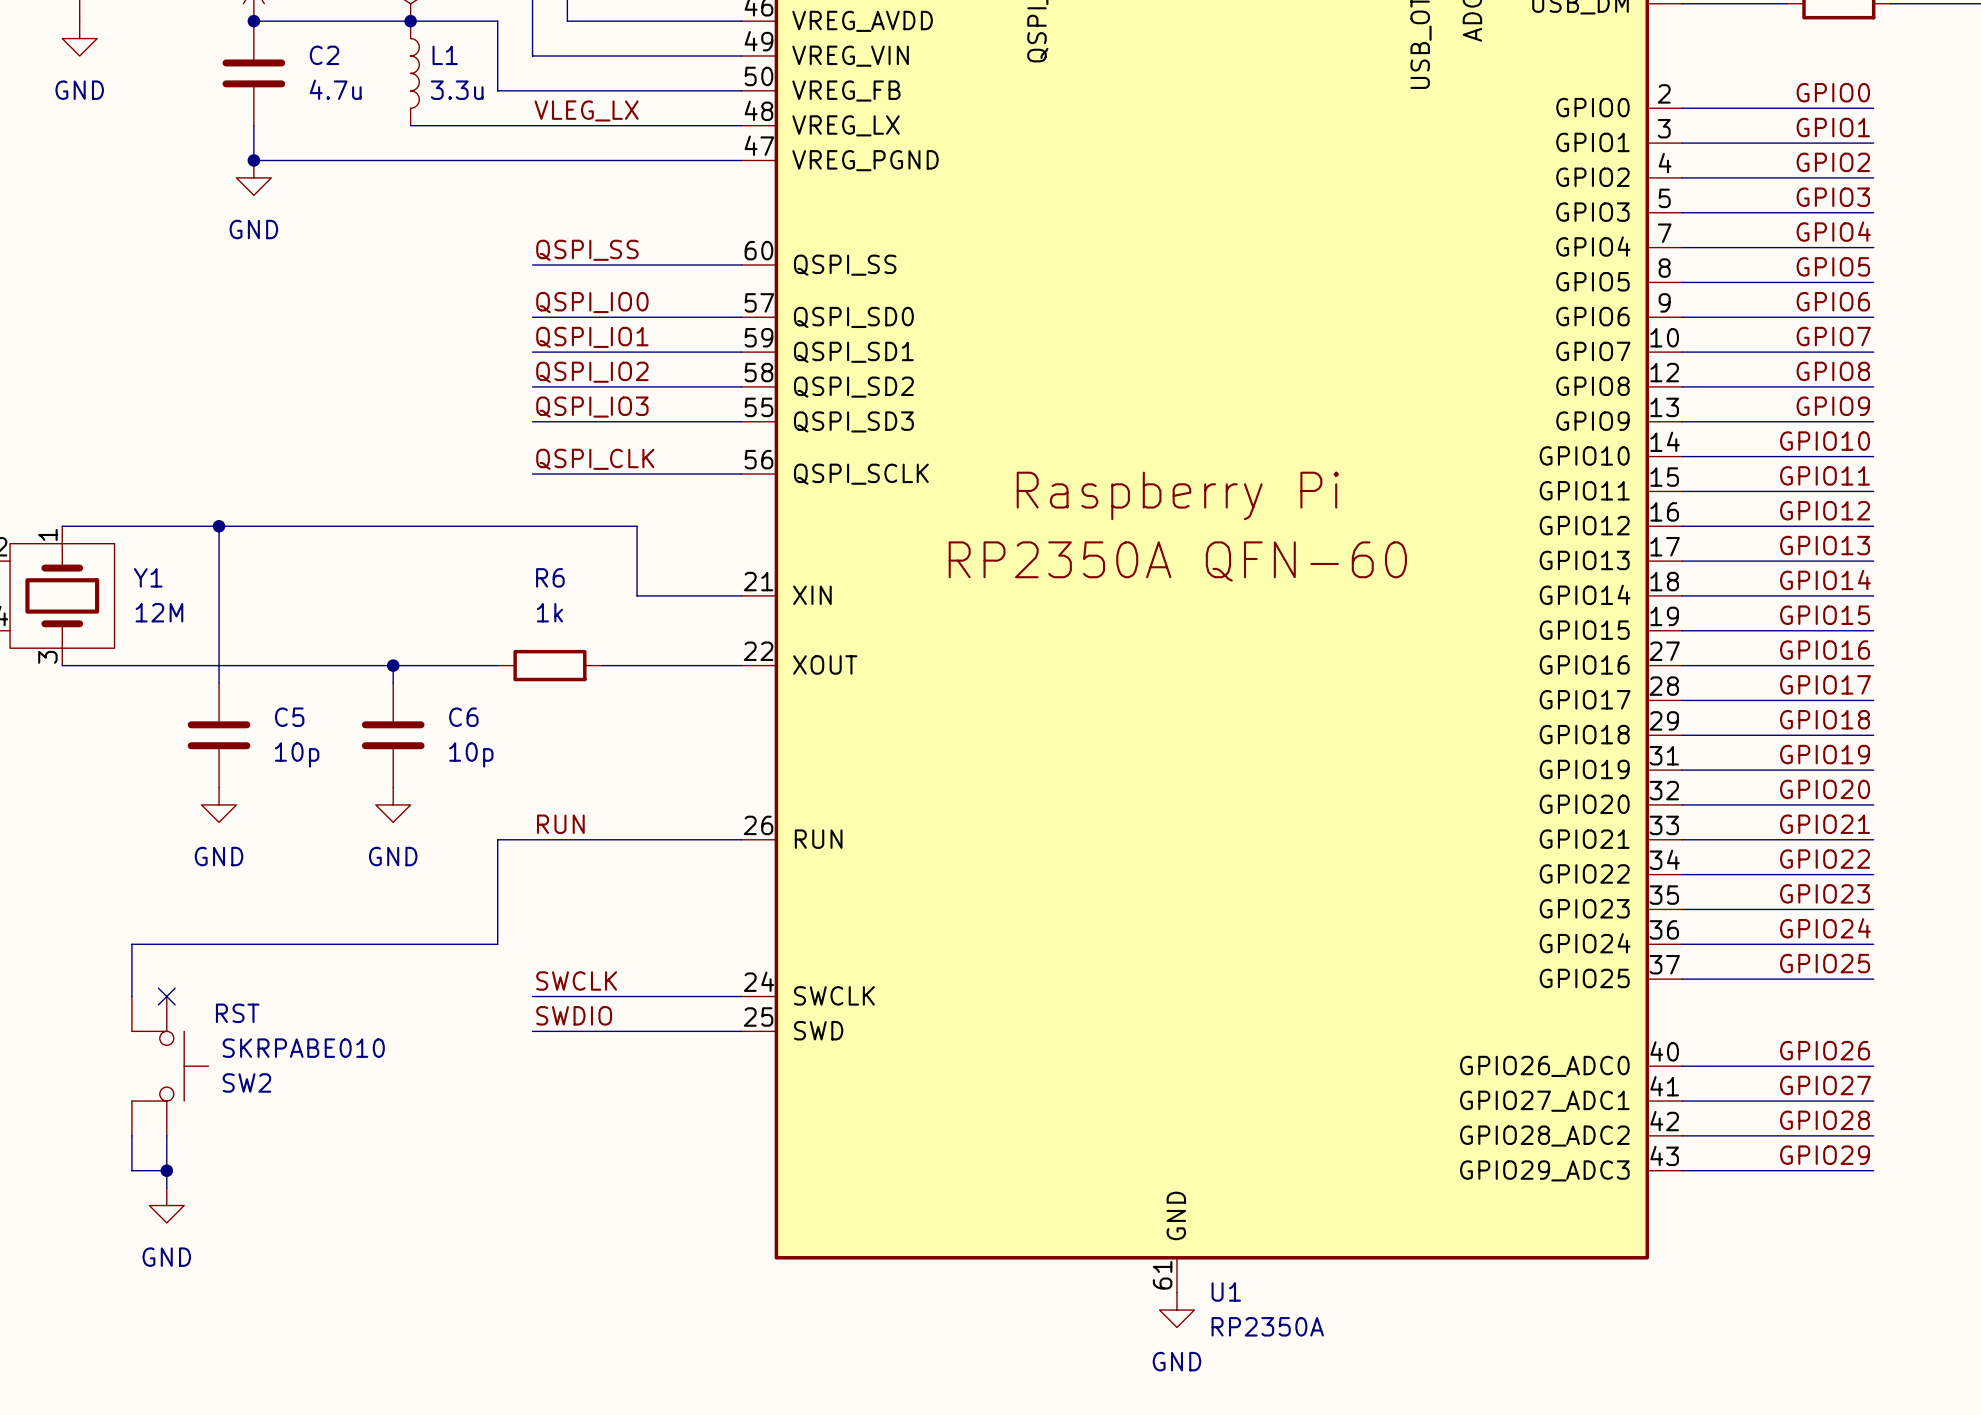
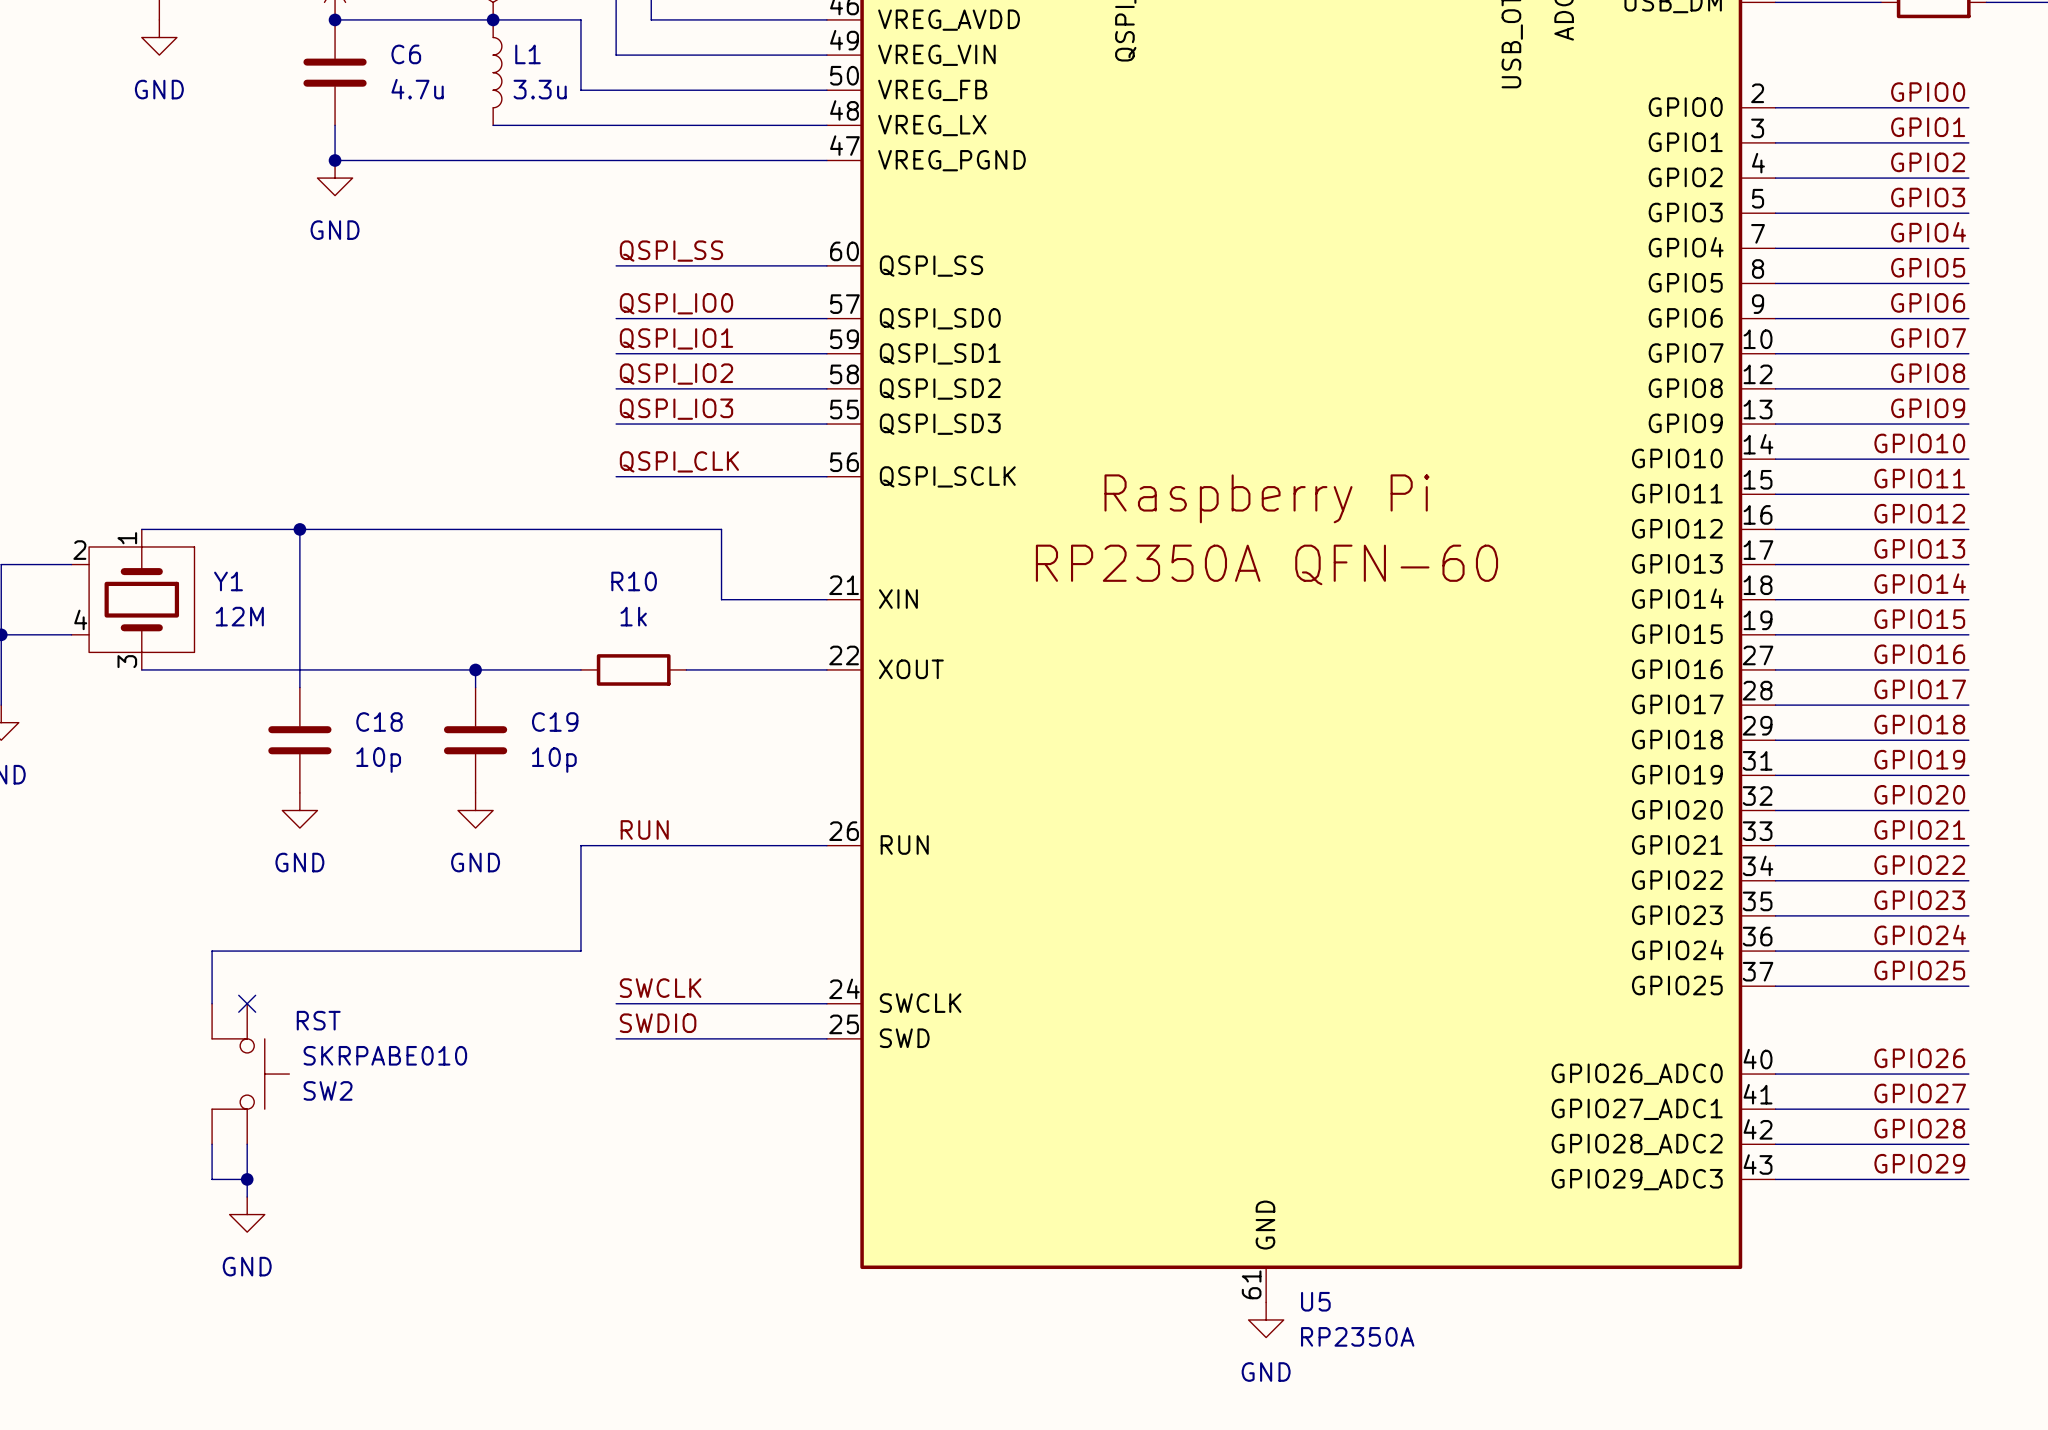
C2 name: C2 (324, 55) -> C6 (406, 54)
label: VLEG_LX (586, 110) -> none
R6 name: R6 (550, 577) -> R10 (634, 581)
C5 name: C5 (289, 717) -> C18 (379, 722)
C6 name: C6 (463, 717) -> C19 (555, 722)
U1 name: U1 (1226, 1291) -> U5 (1315, 1301)

